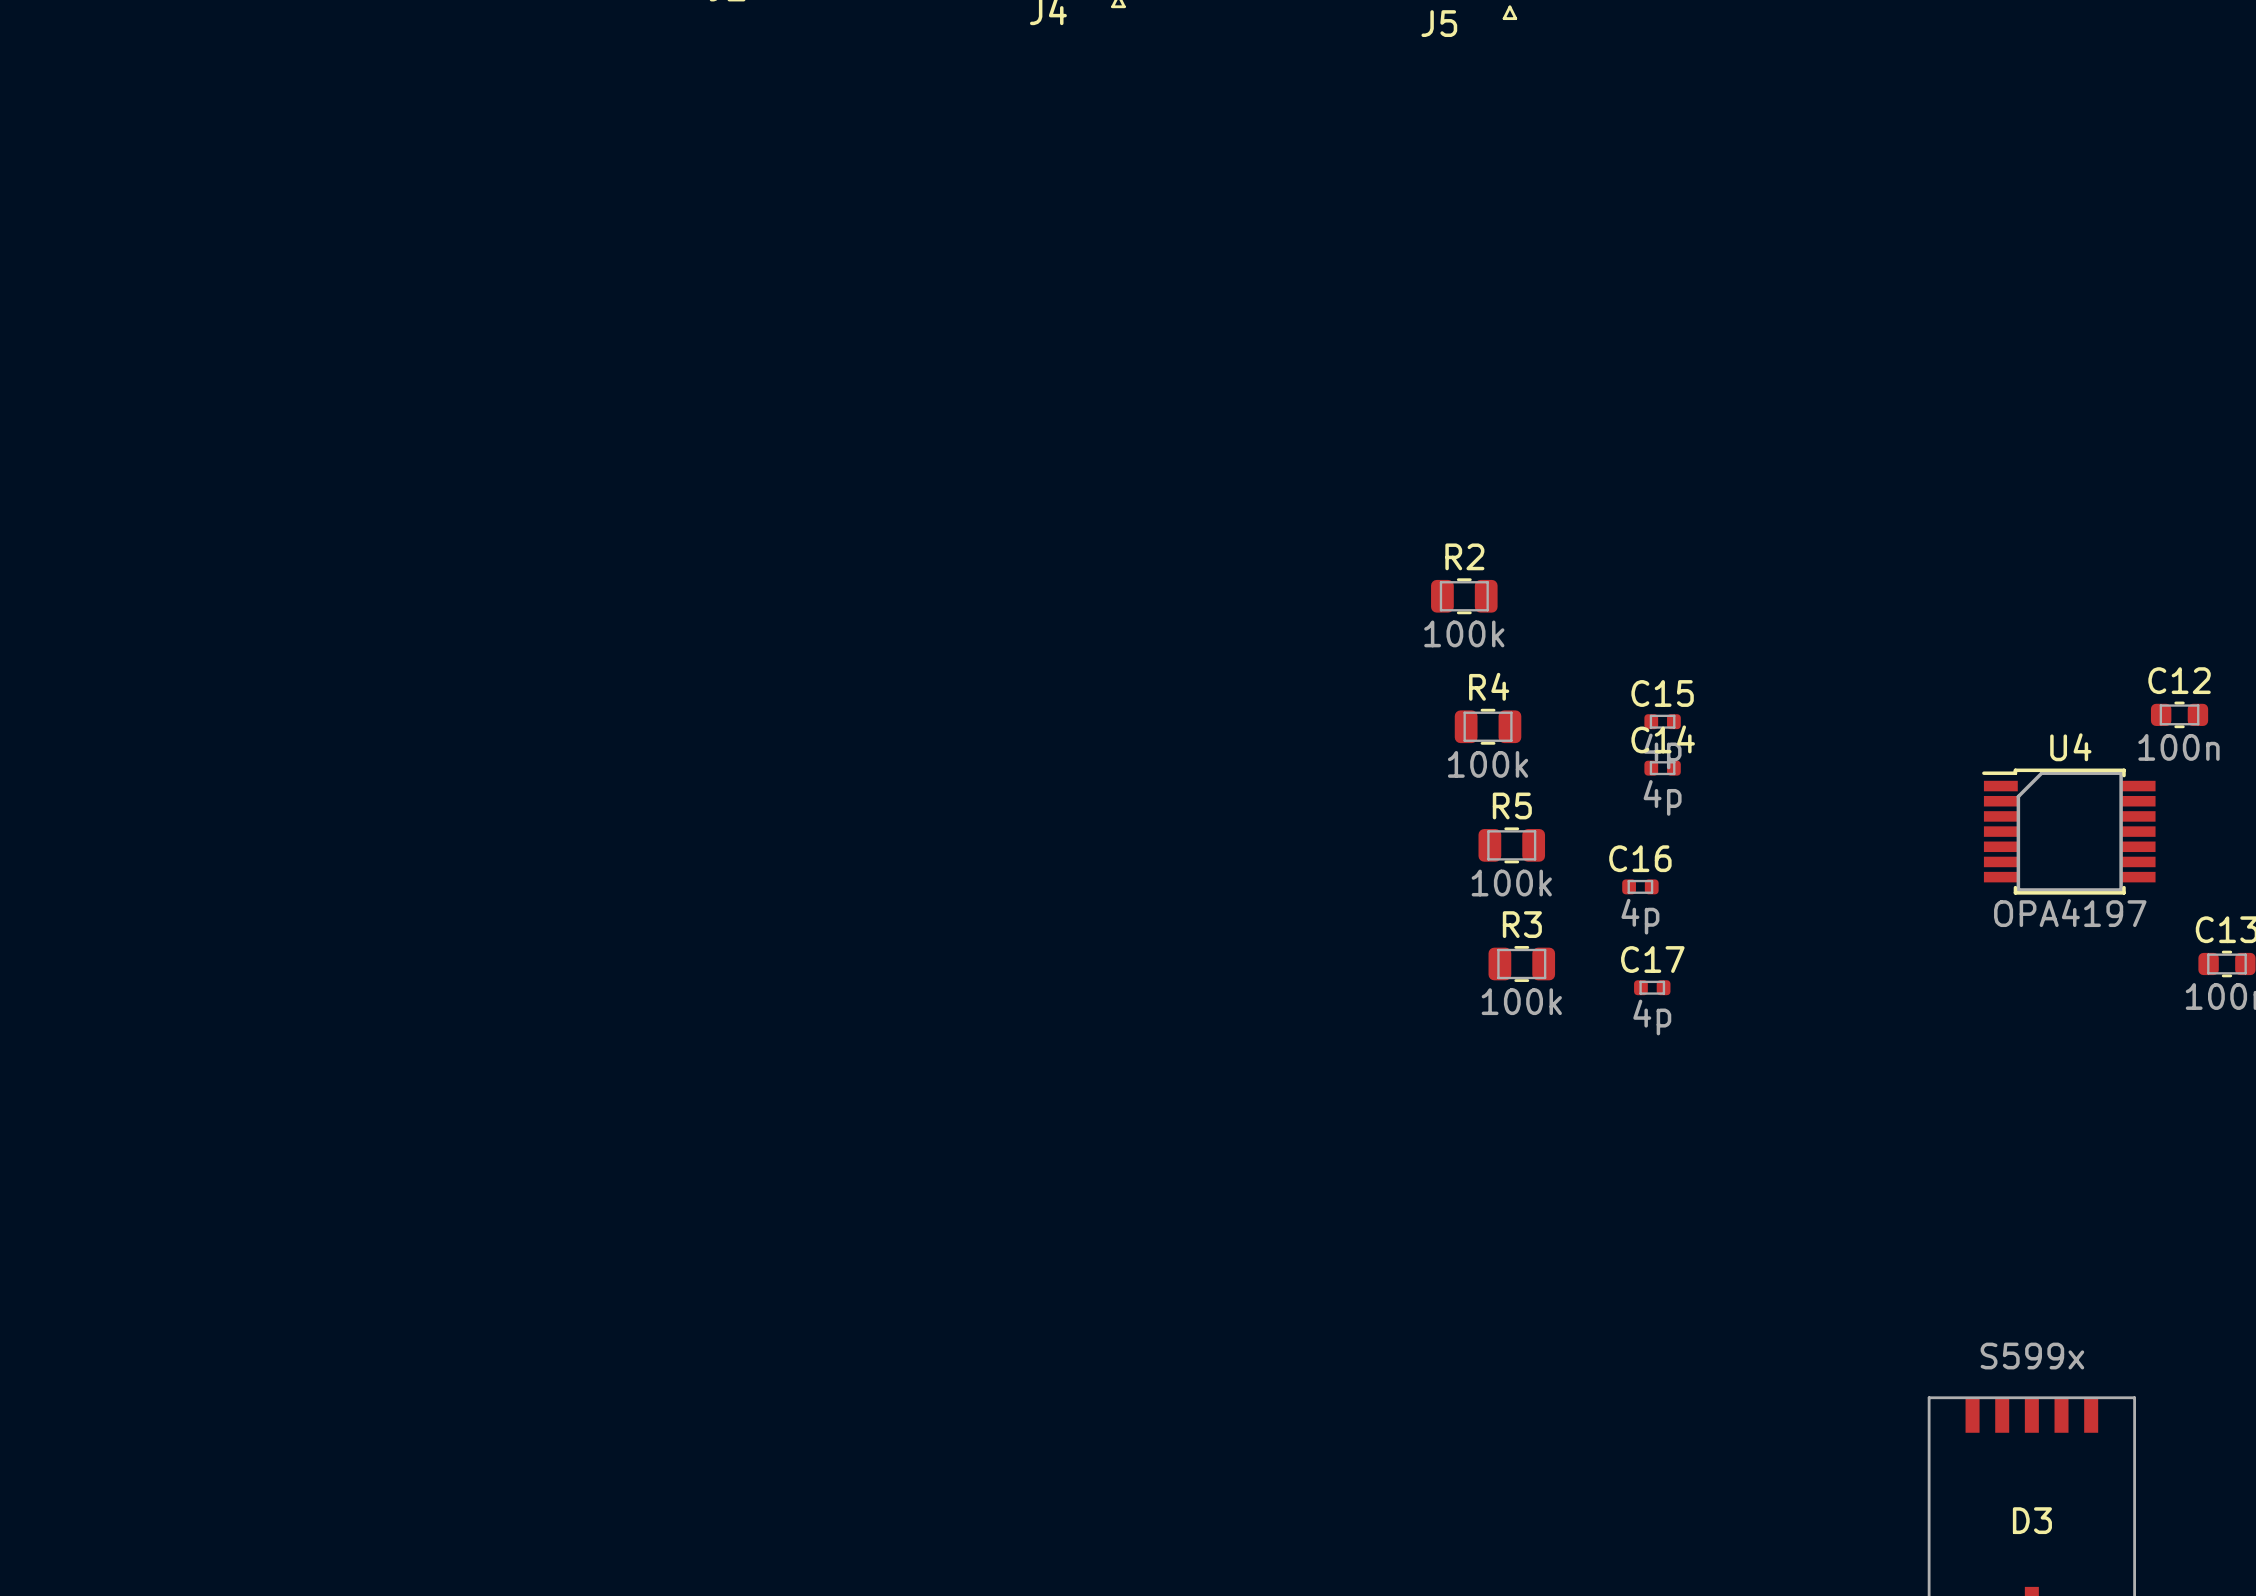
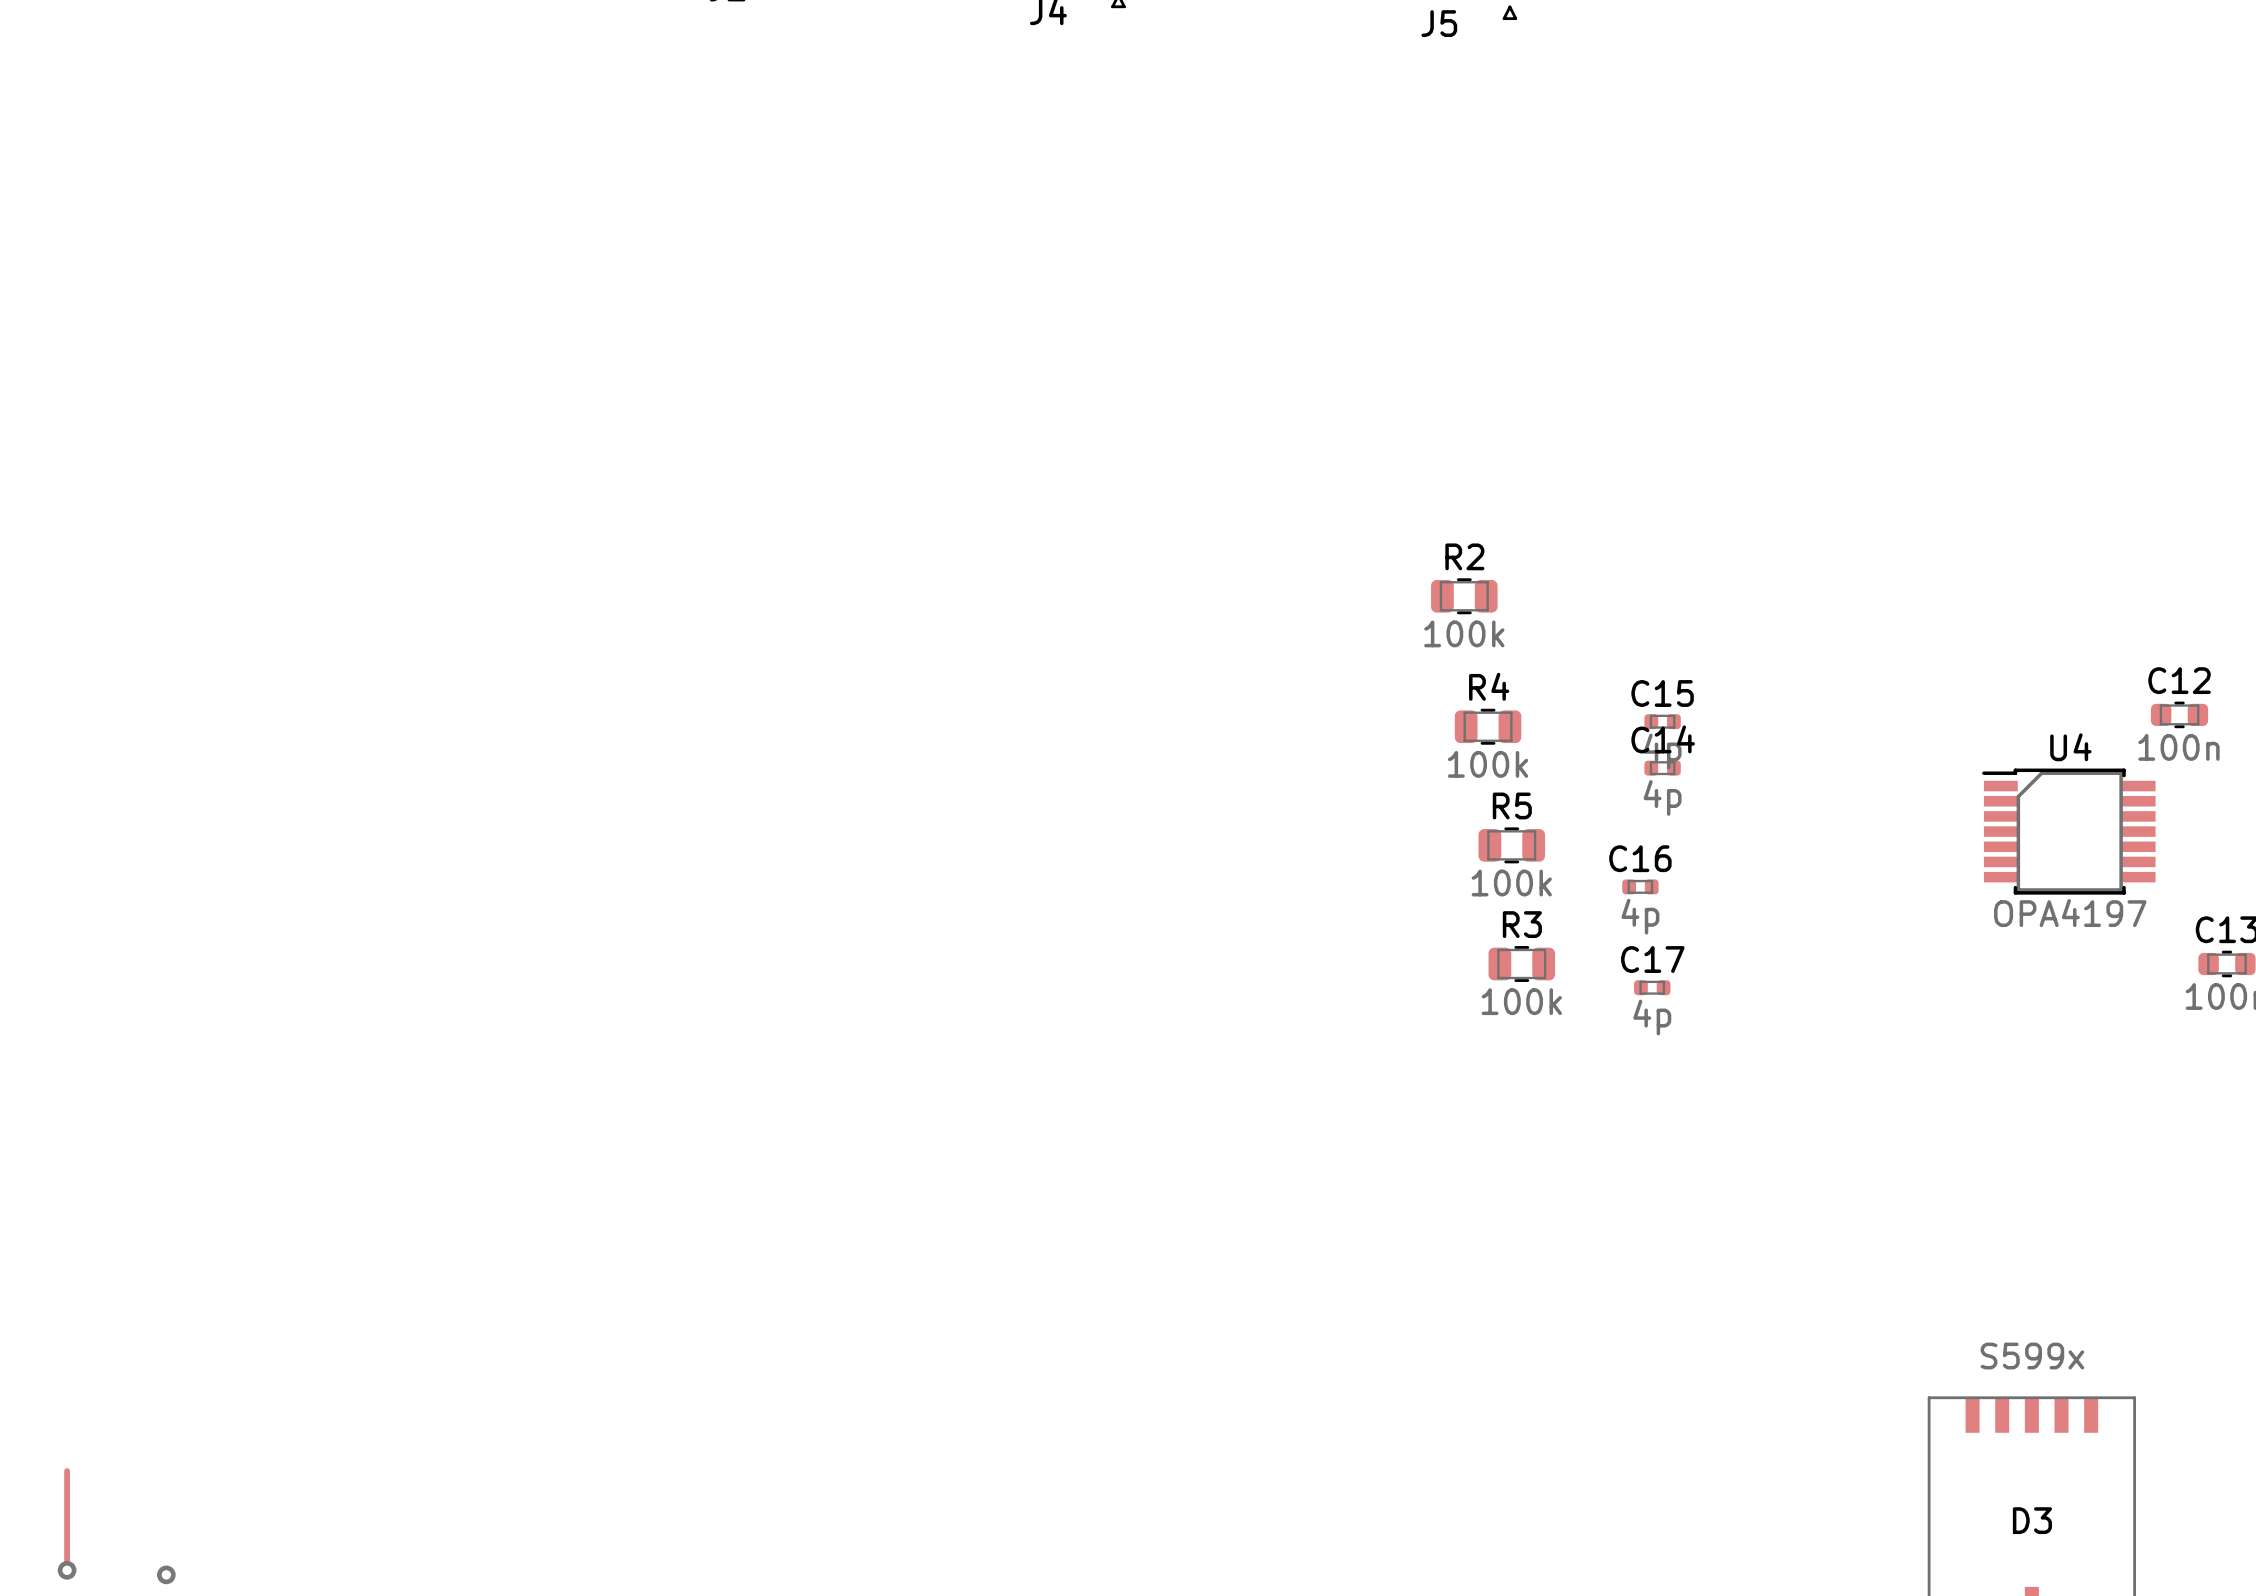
top track: none -> (67, 1471) (67, 1570)
via: none -> (67, 1570)
via: none -> (166, 1574)

